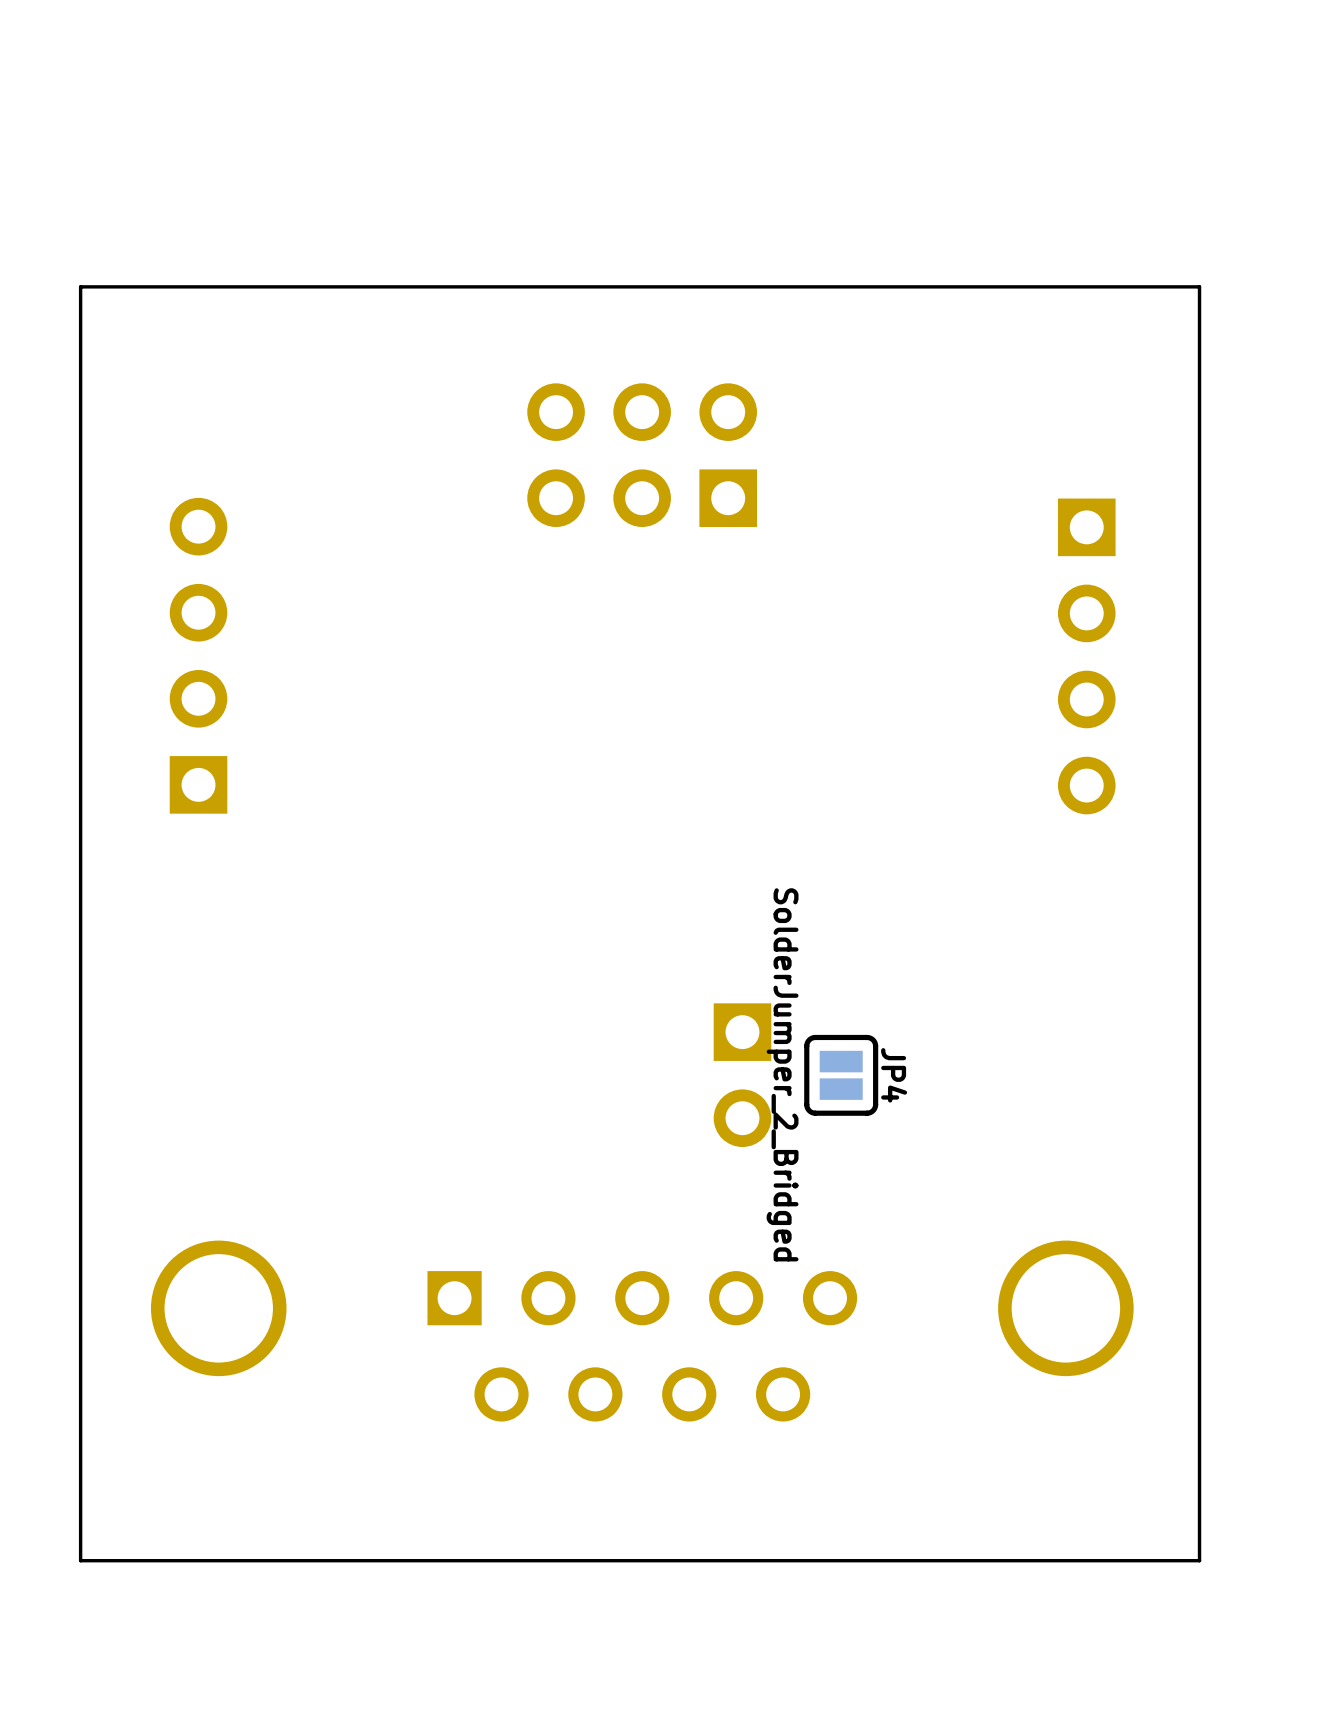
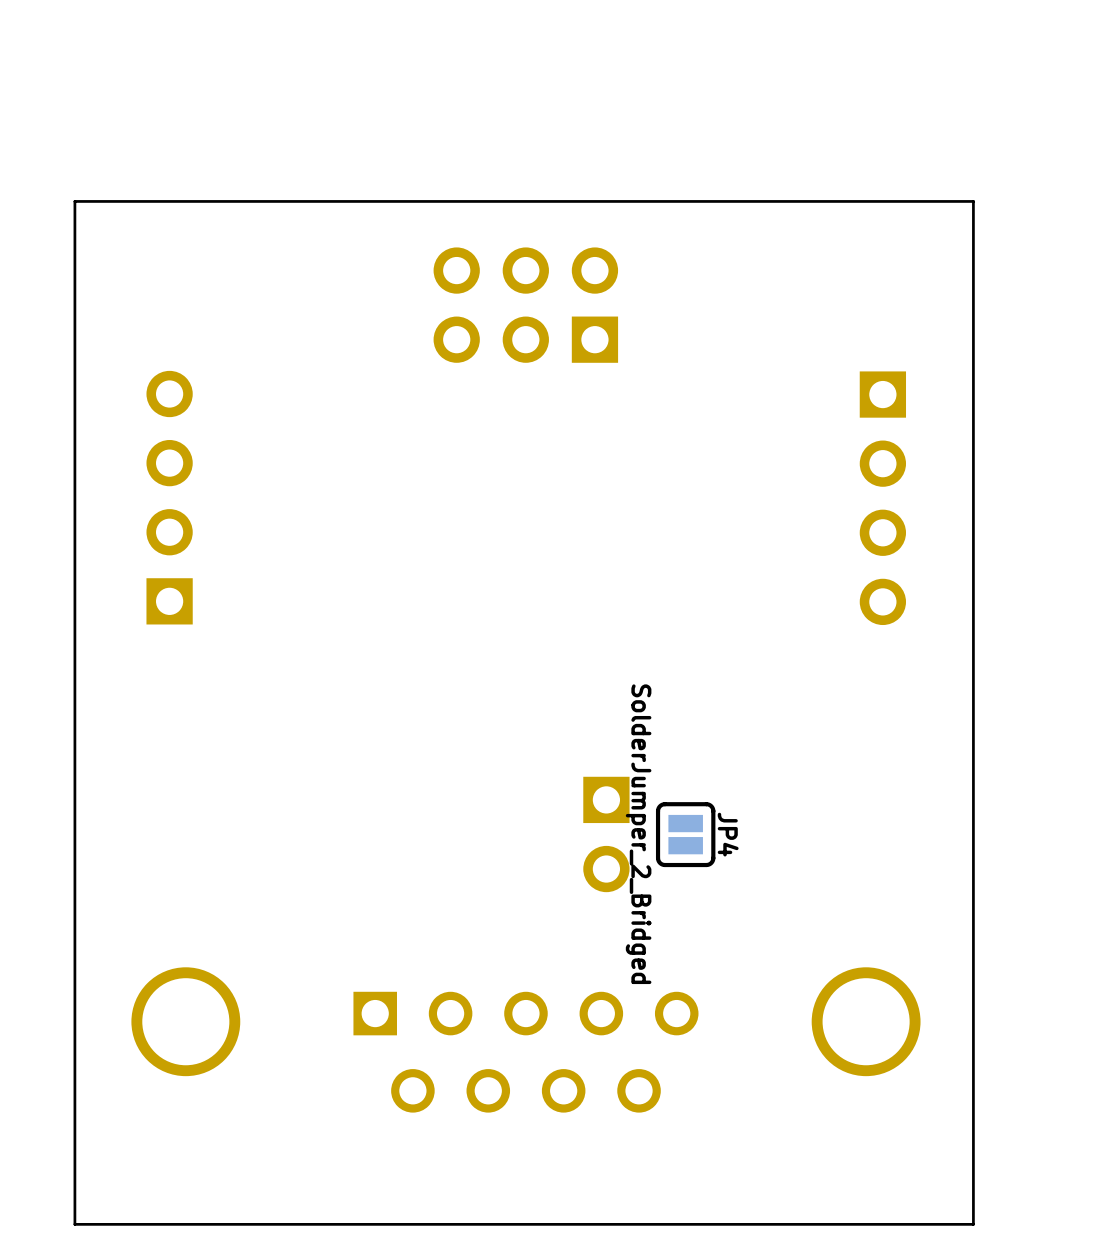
part position: (642, 455) -> (525, 305)

